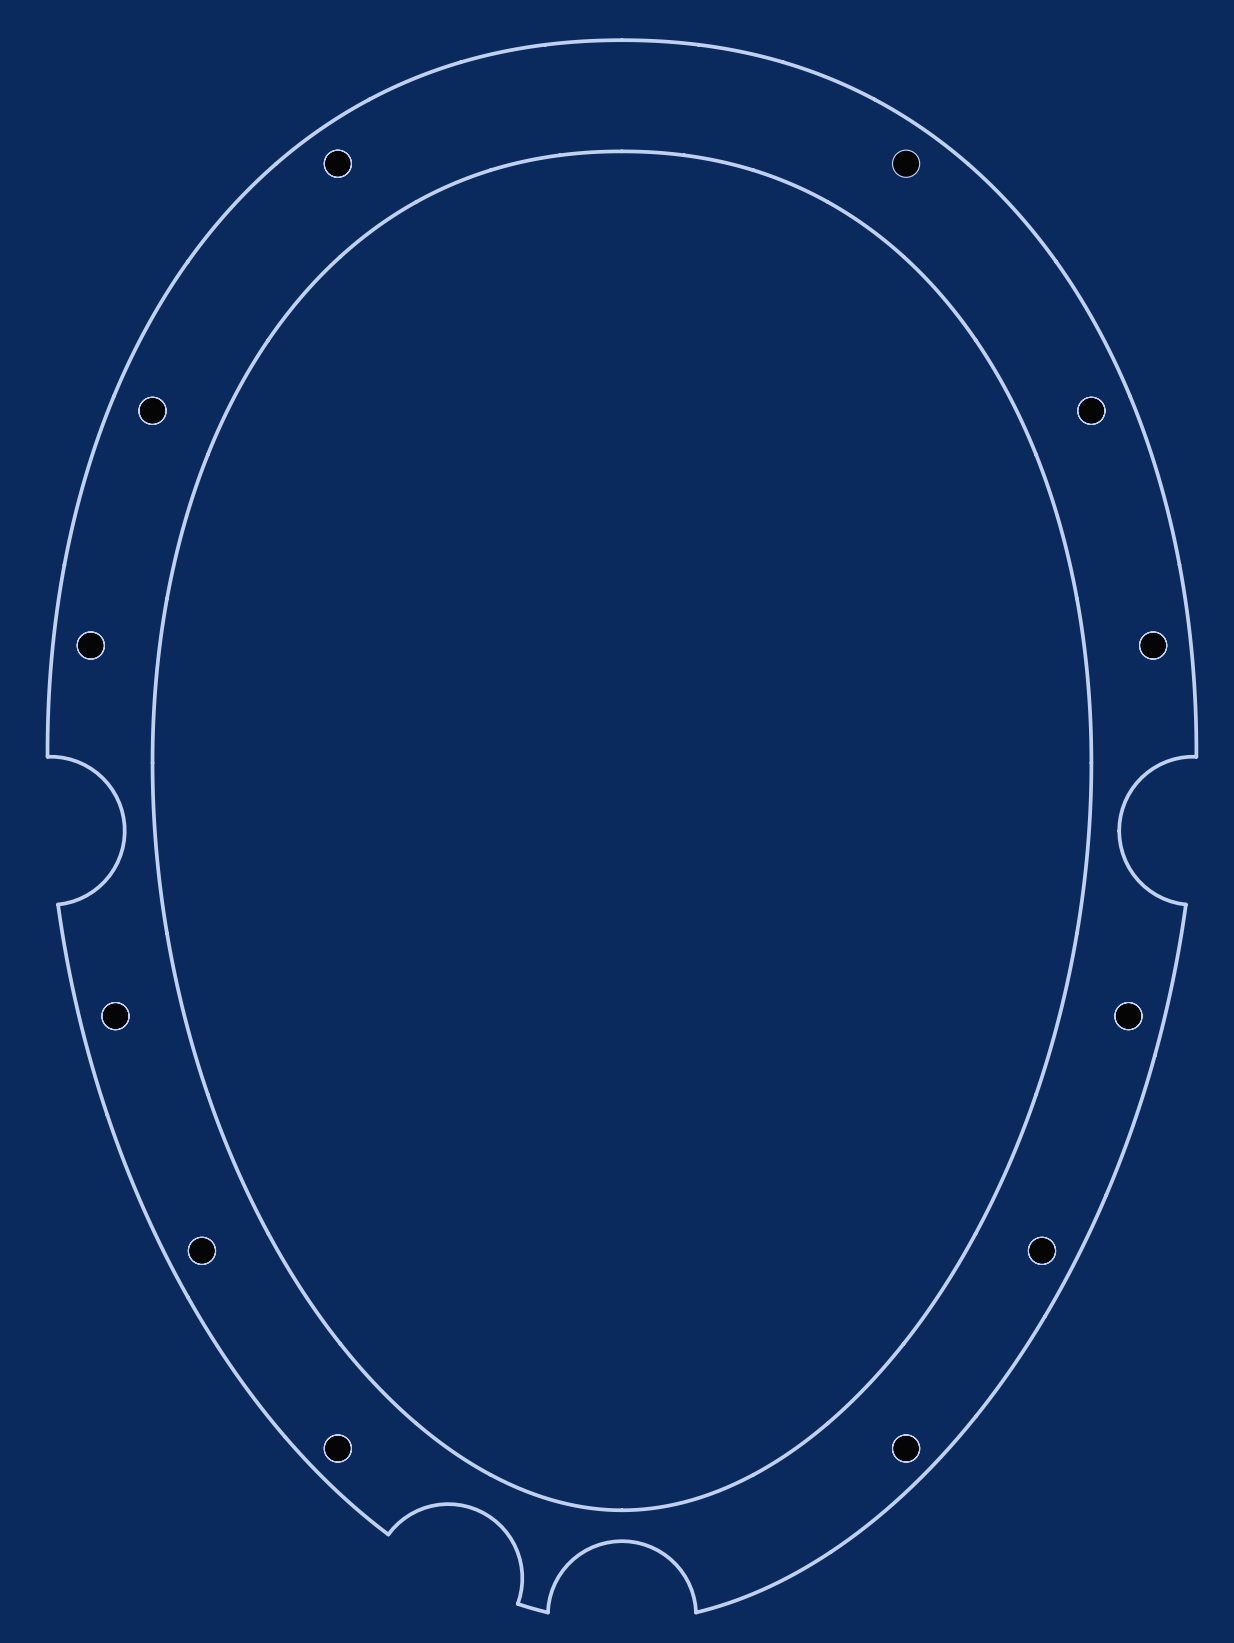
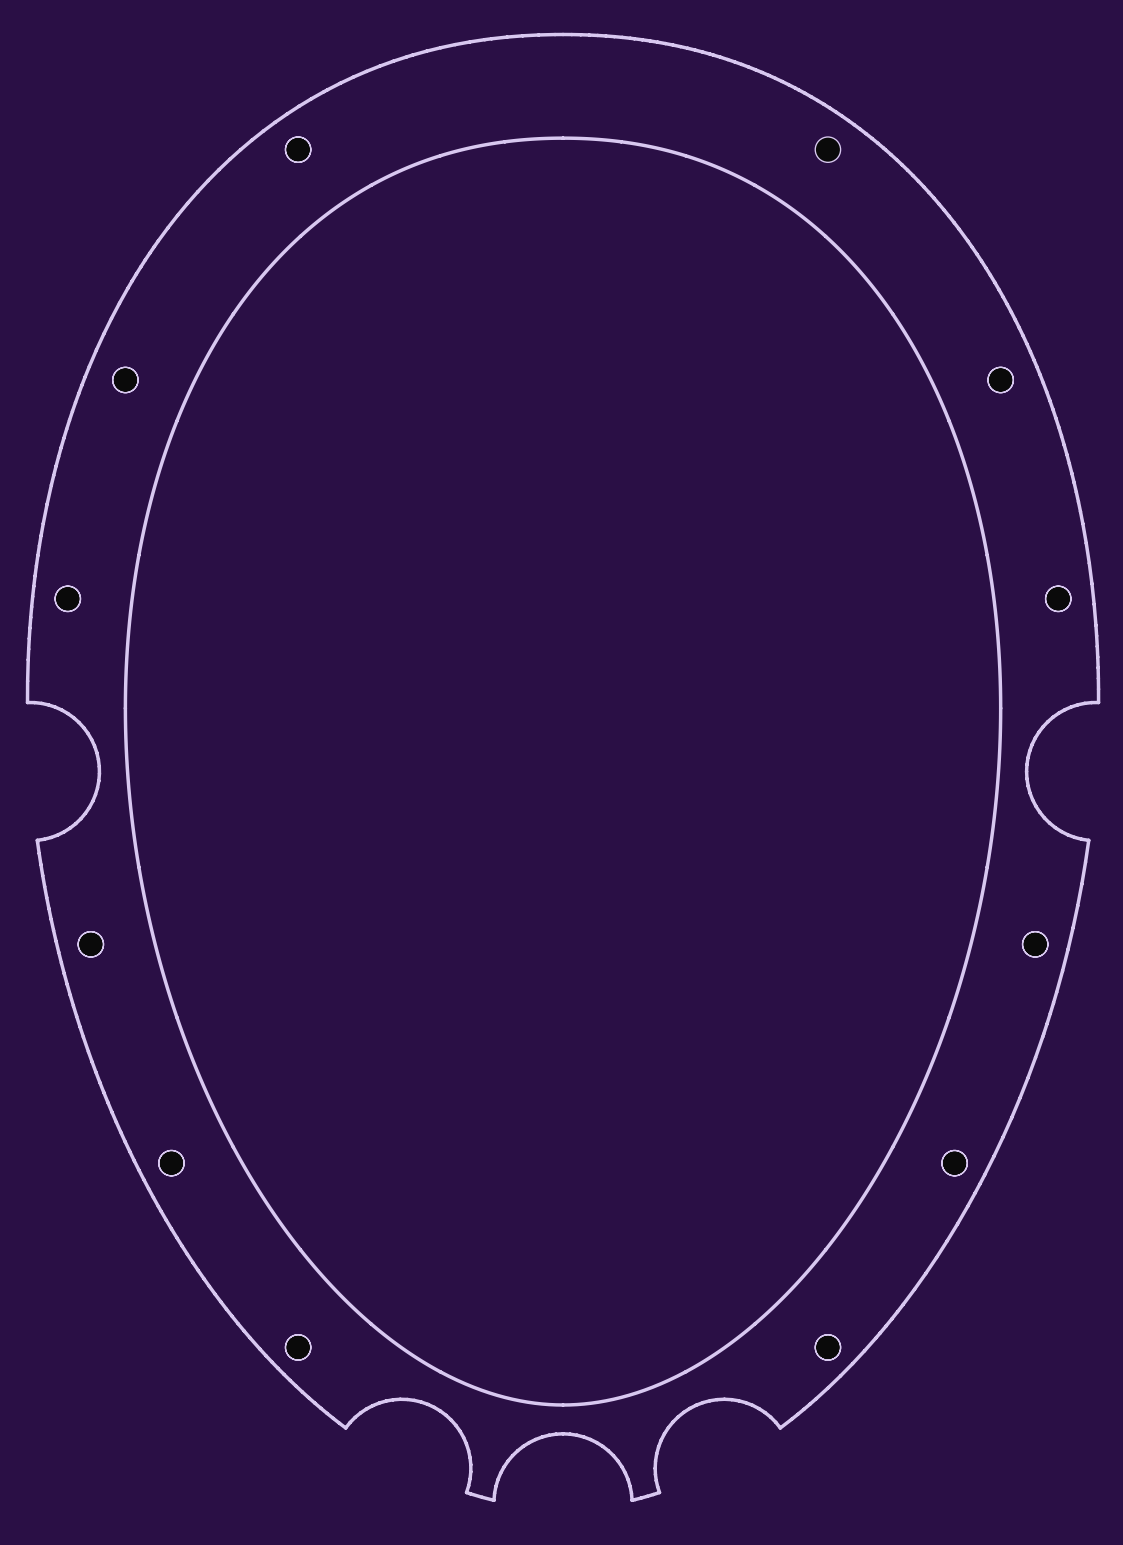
board edge: (621, 40) (617, 40) (612, 40) (603, 40) (589, 40) (560, 43) (503, 51) (449, 65) (392, 87) (340, 116) (293, 149) (247, 190) (208, 233) (172, 284) (139, 341) (109, 405) (88, 466) (68, 542) (56, 611) (49, 682) (47, 756) (70, 759) (90, 768) (102, 778) (112, 789) (121, 810) (124, 825) (124, 840) (120, 855) (113, 869) (104, 881) (86, 895) (72, 901) (58, 904) (75, 999) (103, 1102) (120, 1152) (144, 1210) (193, 1306) (223, 1354) (253, 1398) (285, 1437) (317, 1472) (349, 1503) (388, 1534) (398, 1523) (410, 1514) (424, 1507) (439, 1504) (454, 1504) (469, 1507) (483, 1512) (495, 1521) (510, 1538) (519, 1559) (522, 1581) (517, 1603) (547, 1612) (549, 1597) (555, 1583) (562, 1570) (573, 1559) (592, 1547) (606, 1542) (621, 1541) (637, 1542) (651, 1547) (670, 1559) (680, 1570) (688, 1583) (693, 1597) (696, 1612) (744, 1597) (795, 1573) (848, 1539) (894, 1502) (939, 1458) (984, 1405) (1024, 1349) (1061, 1287) (1106, 1194) (1141, 1100) (1168, 1000) (1185, 904) (1170, 901) (1156, 895) (1143, 886) (1133, 874) (1125, 861) (1120, 846) (1119, 830) (1120, 815) (1128, 795) (1136, 782) (1147, 772) (1167, 761) (1181, 757) (1196, 756) (1195, 707) (1189, 634) (1179, 564) (1164, 498) (1145, 435) (1121, 377) (1090, 315) (1061, 268) (1024, 220) (984, 179) (938, 140) (892, 109) (845, 85) (794, 65) (739, 51) (683, 43) (654, 40) (640, 40) (631, 40) (626, 40) (621, 40) -> (563, 34) (622, 37) (672, 45) (720, 57) (768, 75) (811, 96) (854, 124) (896, 159) (934, 198) (967, 240) (999, 289) (1026, 343) (1049, 400) (1069, 463) (1082, 523) (1091, 583) (1097, 646) (1098, 702) (1071, 706) (1053, 717) (1038, 732) (1027, 757) (1028, 785) (1032, 799) (1039, 812) (1049, 823) (1061, 831) (1074, 837) (1088, 840) (1073, 927) (1047, 1023) (1011, 1117) (975, 1193) (936, 1257) (903, 1304) (864, 1350) (816, 1398) (780, 1427) (765, 1412) (752, 1405) (738, 1400) (724, 1399) (710, 1400) (689, 1408) (678, 1416) (668, 1427) (658, 1446) (655, 1468) (659, 1492) (632, 1500) (625, 1473) (608, 1450) (583, 1437) (563, 1433) (542, 1437) (517, 1450) (500, 1473) (493, 1500) (466, 1492) (470, 1471) (468, 1450) (460, 1431) (446, 1415) (421, 1402) (393, 1399) (366, 1408) (345, 1427) (308, 1397) (277, 1368) (220, 1301) (166, 1220) (120, 1132) (83, 1037) (53, 930) (37, 840) (64, 831) (80, 818) (89, 807) (98, 780) (96, 752) (87, 733) (73, 717) (55, 707) (27, 702) (29, 638) (36, 565) (47, 504) (66, 429) (85, 376) (111, 318) (140, 266) (177, 215) (218, 169) (263, 131) (311, 98) (353, 77) (406, 56) (455, 44) (507, 37) (563, 34)

